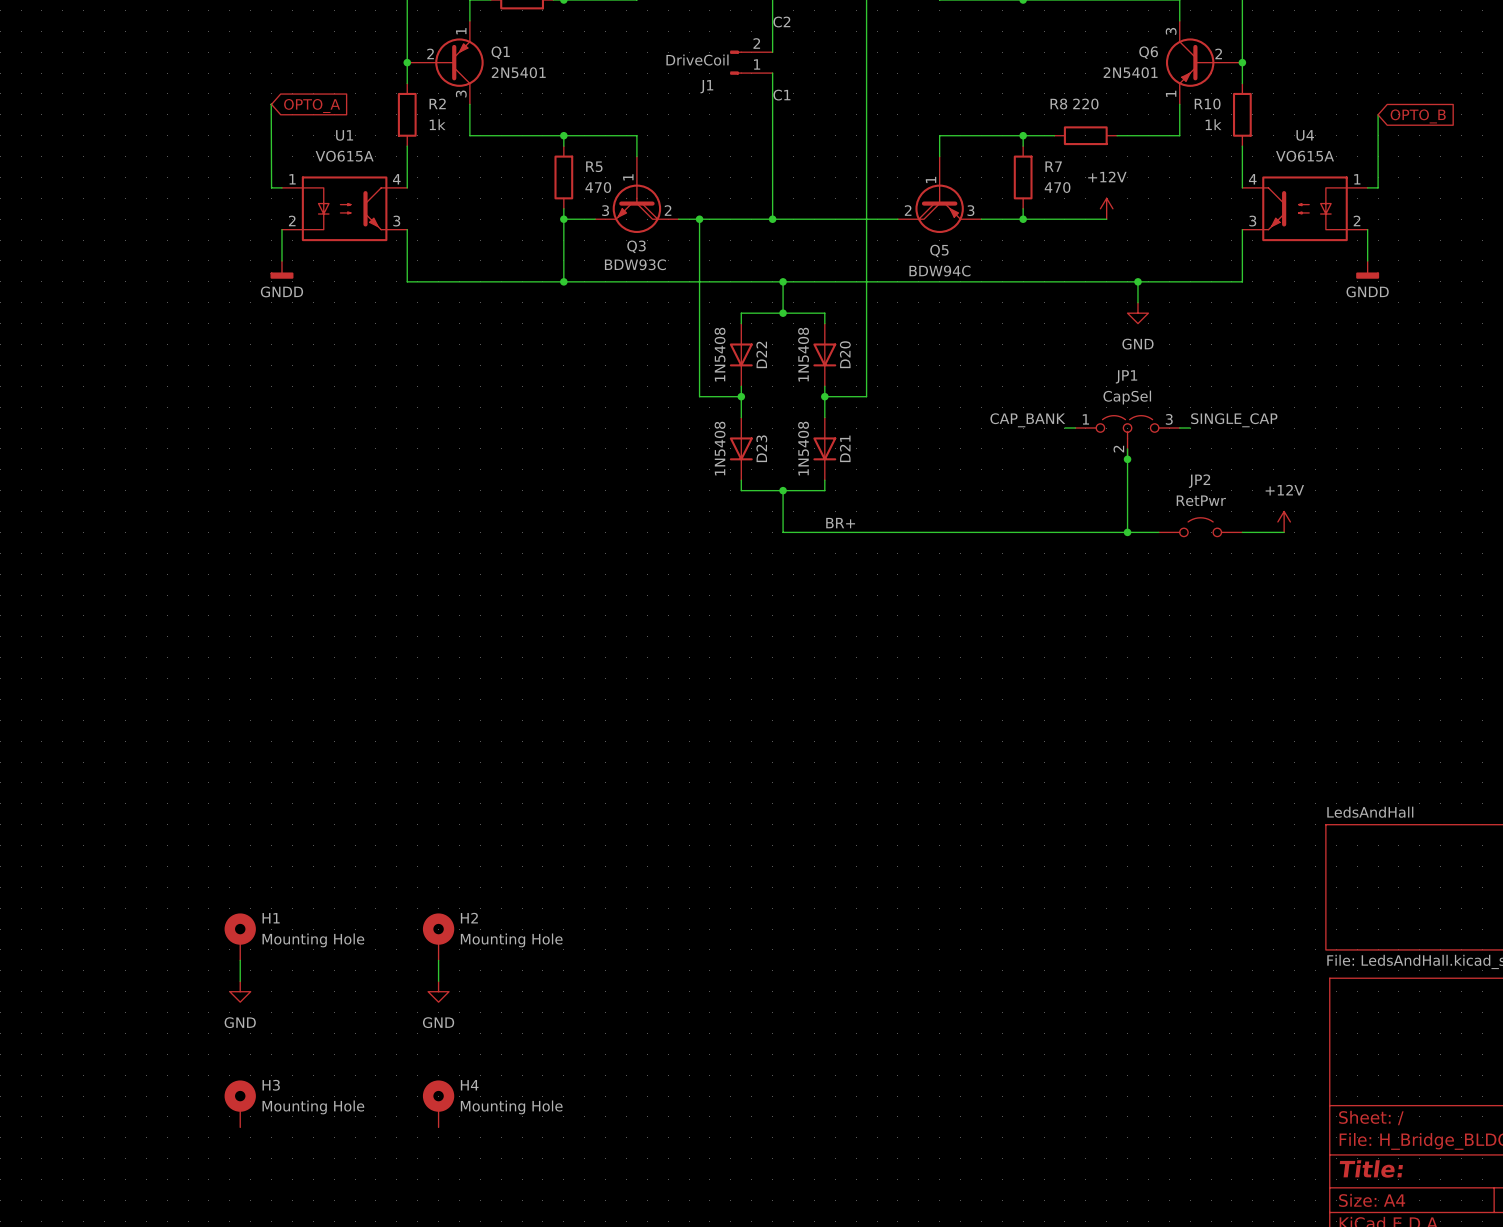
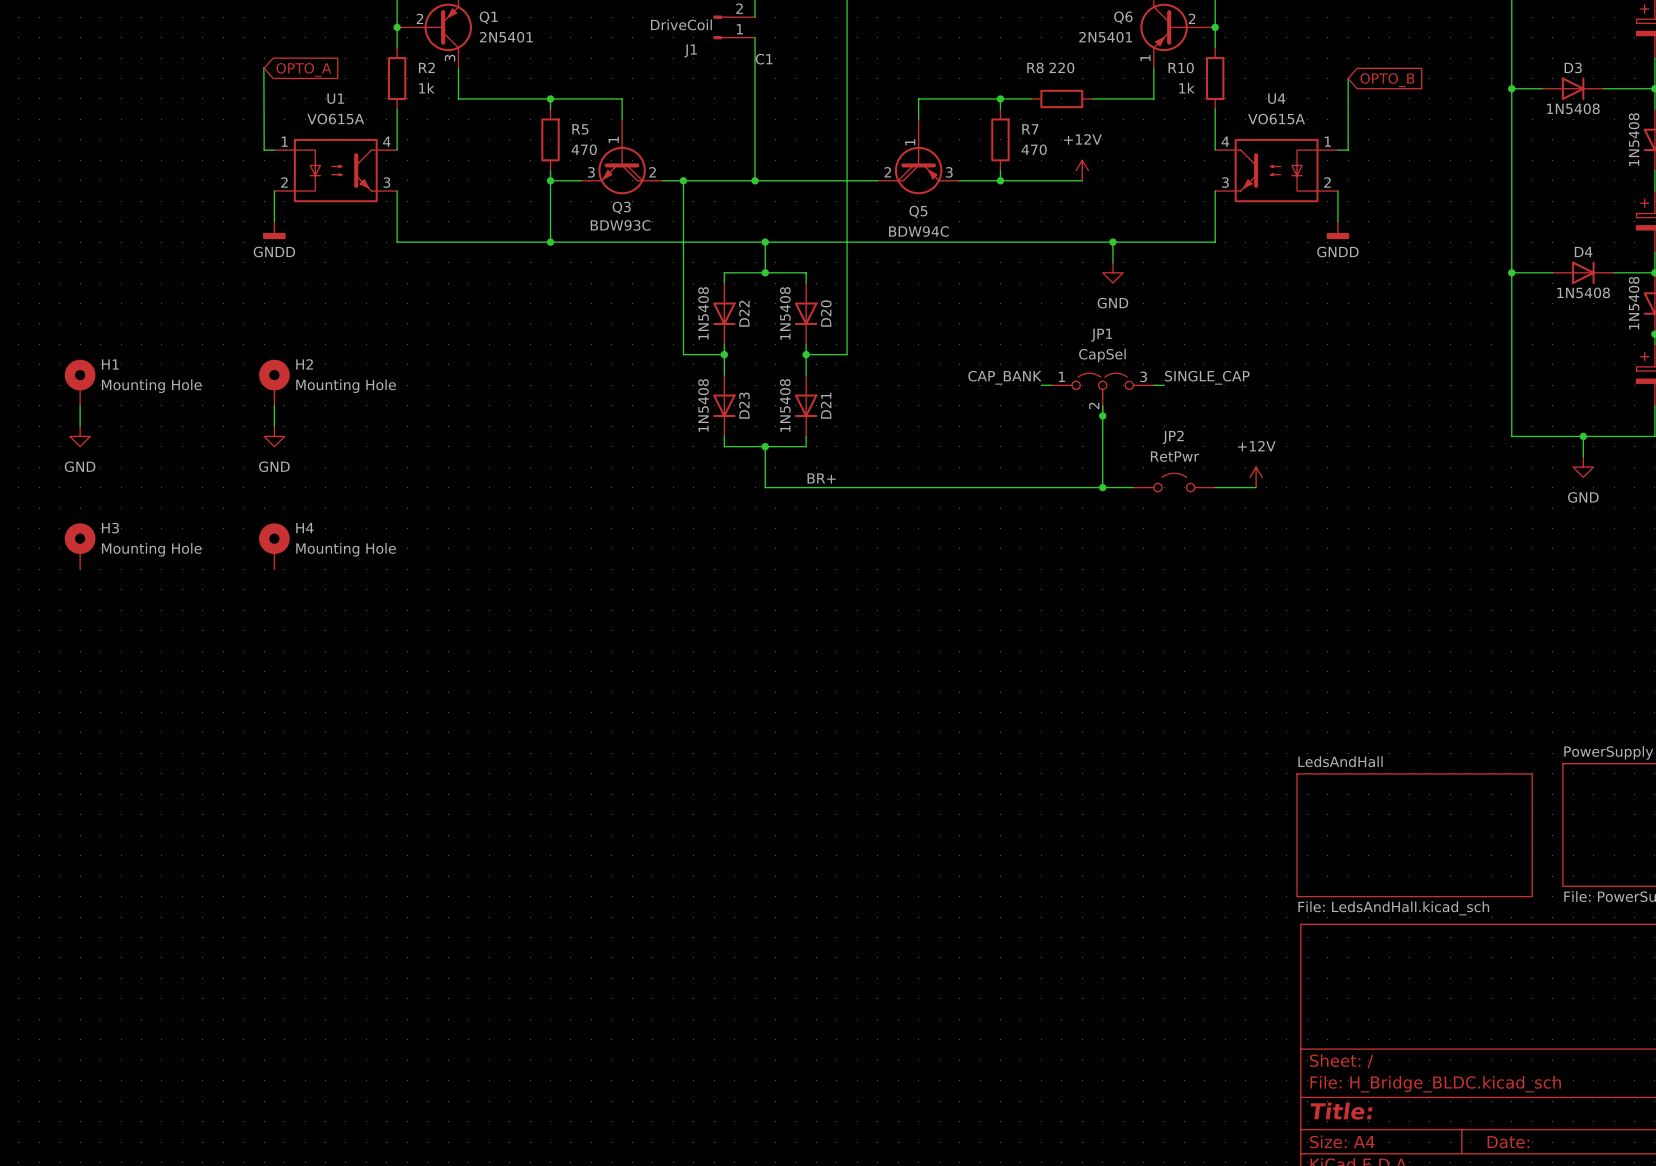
wire: none -> (80, 405) (80, 426)
wire: none -> (274, 405) (274, 426)
power symbol: none -> GND (80, 436)
power symbol: none -> GND (274, 436)
H1 position: (240, 936) -> (80, 382)
H2 position: (438, 936) -> (274, 382)
wire: (240, 960) (240, 981) -> none
wire: (438, 960) (438, 981) -> none
power symbol: GND (240, 991) -> none
power symbol: GND (438, 991) -> none
H3 position: (240, 1103) -> (80, 546)
H4 position: (438, 1103) -> (274, 546)

